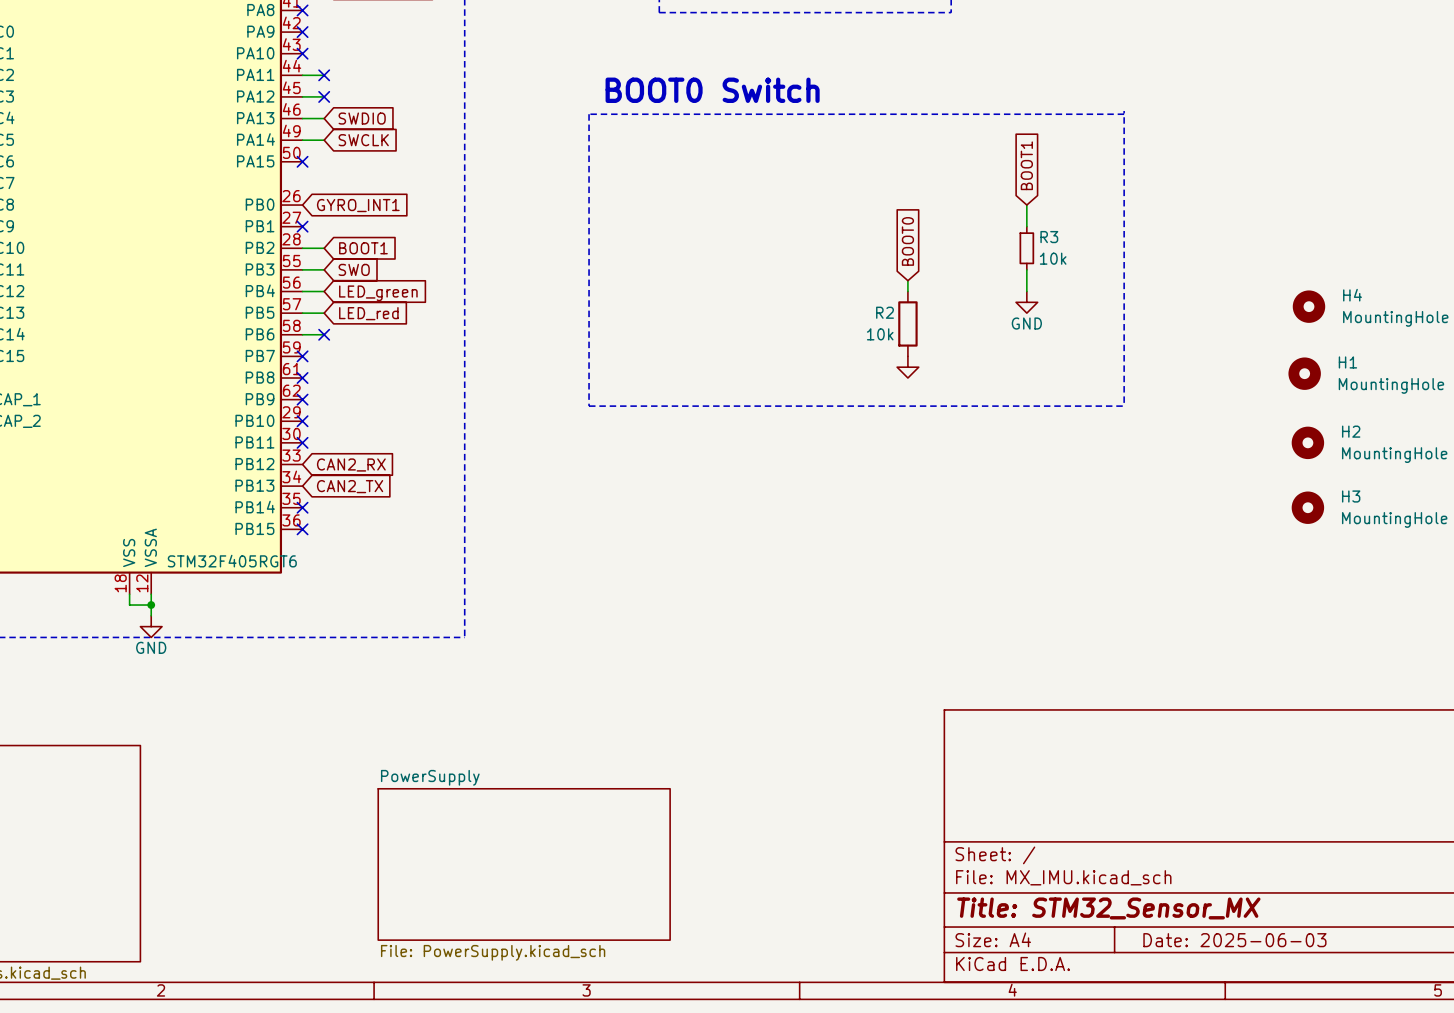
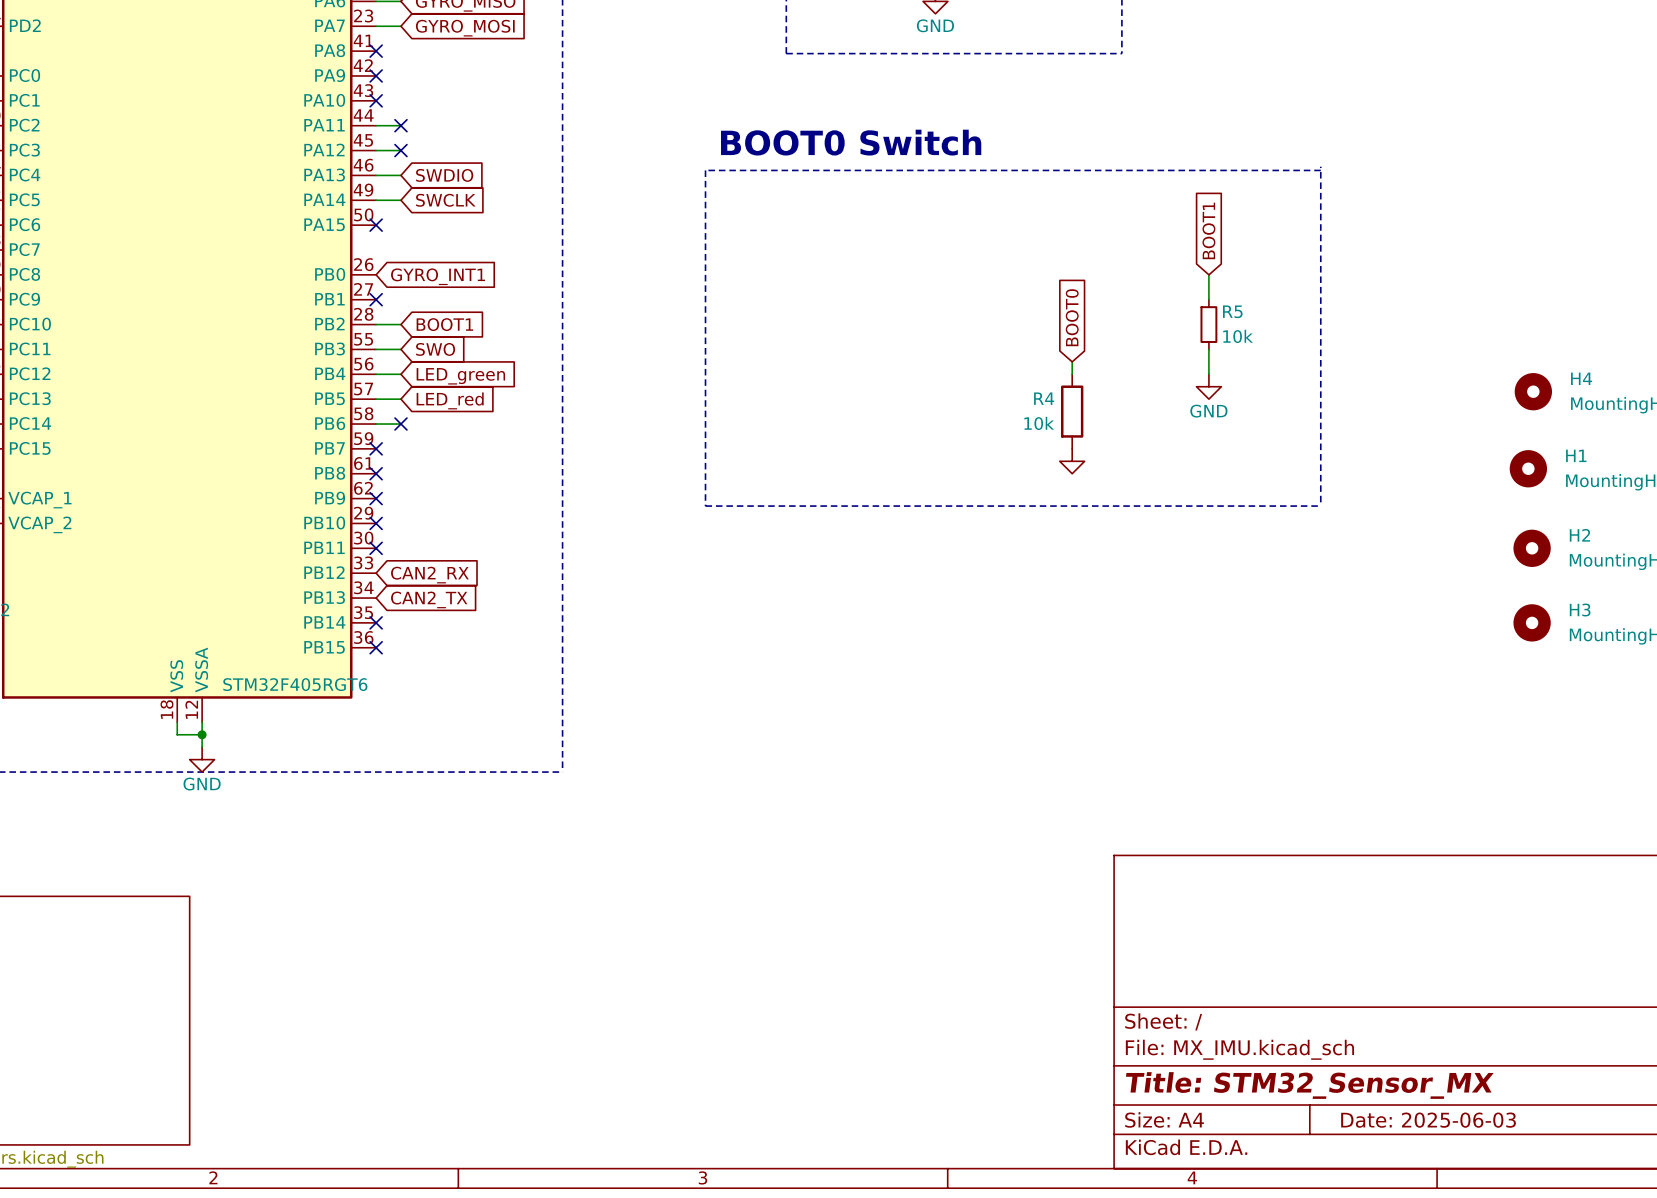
R3 name: R3 (1049, 237) -> R5 (1232, 311)
R2 name: R2 (885, 312) -> R4 (1044, 398)
sheet PowerSupply: File: PowerSupply.kicad_sch (524, 864) -> none

